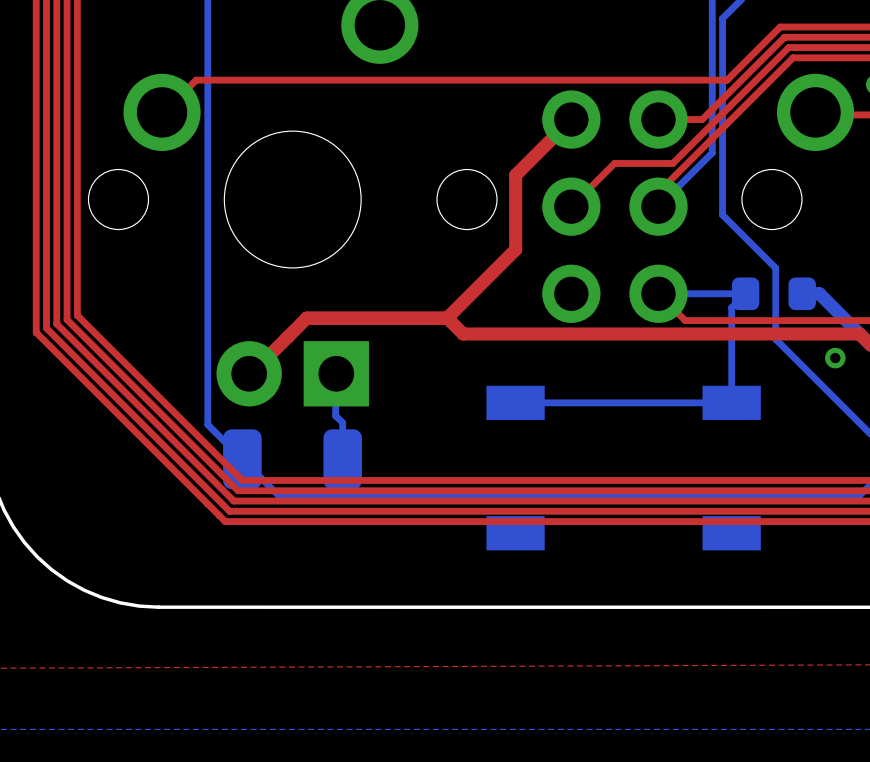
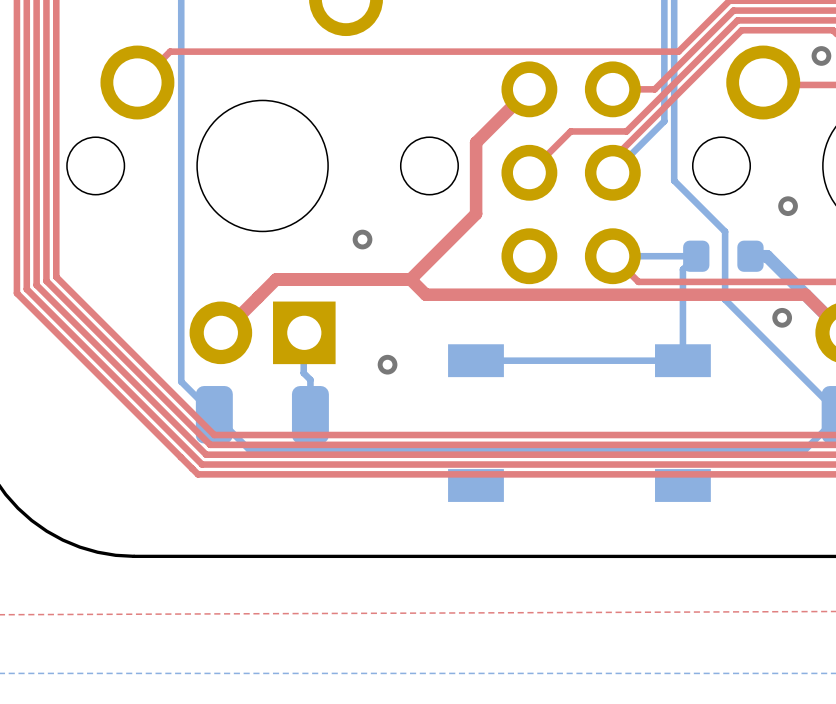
via: none -> (788, 206)
via: none -> (362, 239)
via: none -> (387, 364)

